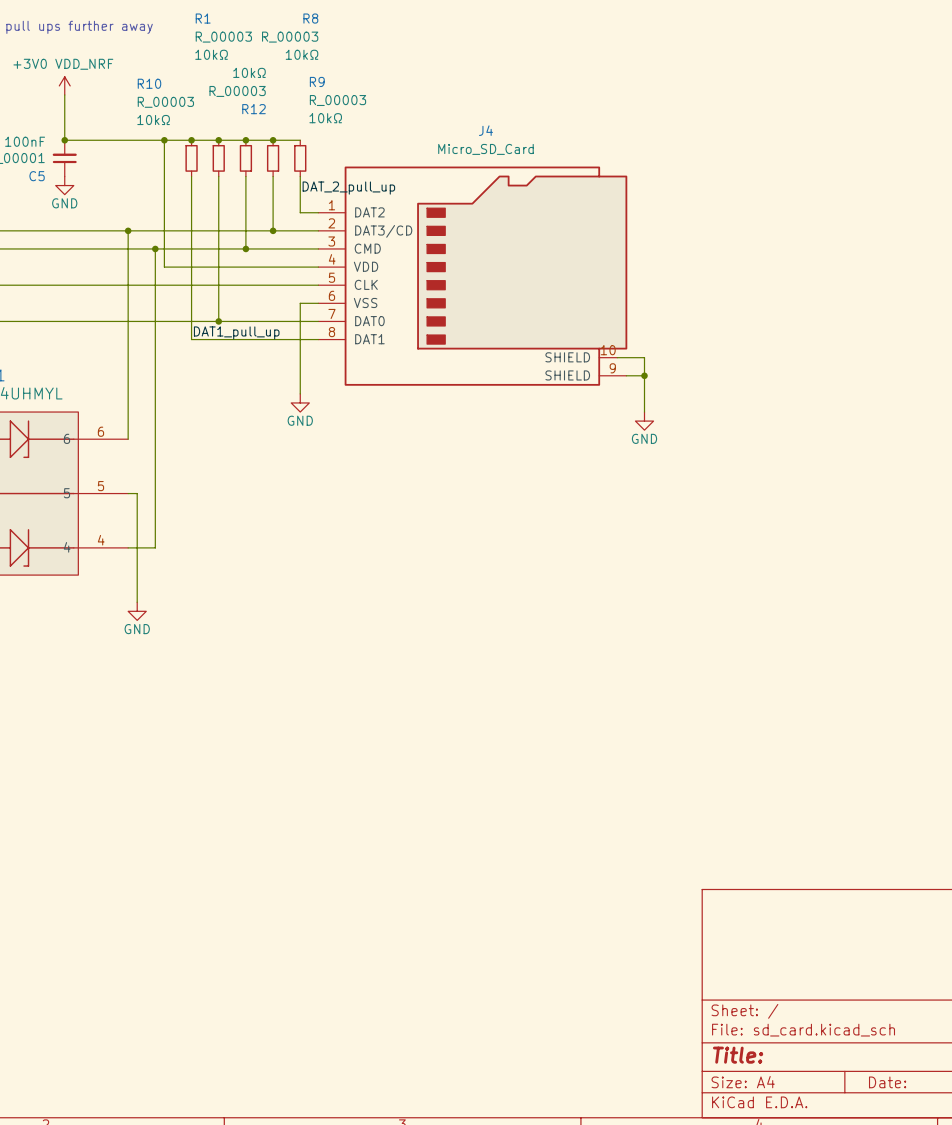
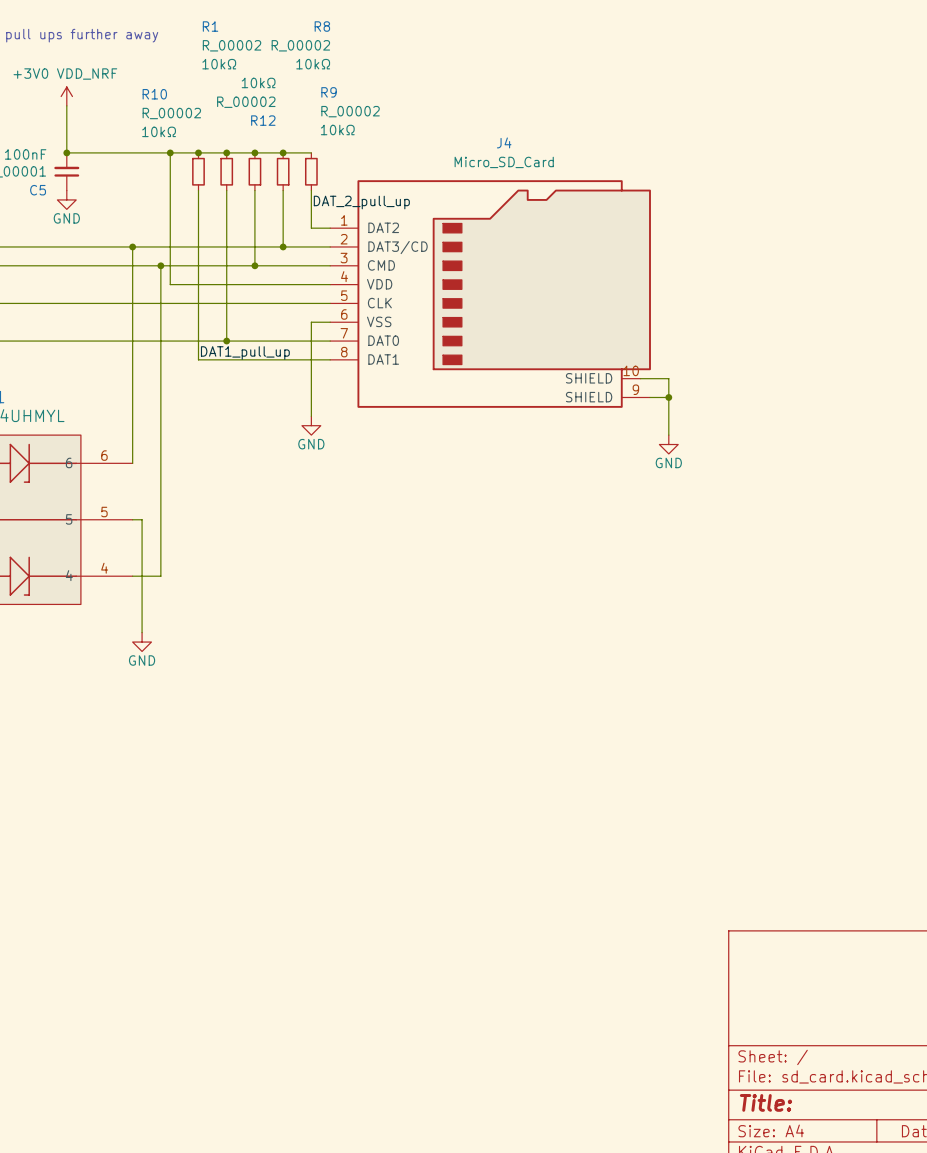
R1 value: R_00003 (223, 37) -> R_00002 (232, 45)
R8 value: R_00003 (290, 37) -> R_00002 (300, 45)
R12 value: R_00003 (237, 91) -> R_00002 (246, 102)
R9 value: R_00003 (337, 100) -> R_00002 (350, 111)
R10 value: R_00003 (165, 102) -> R_00002 (171, 113)

